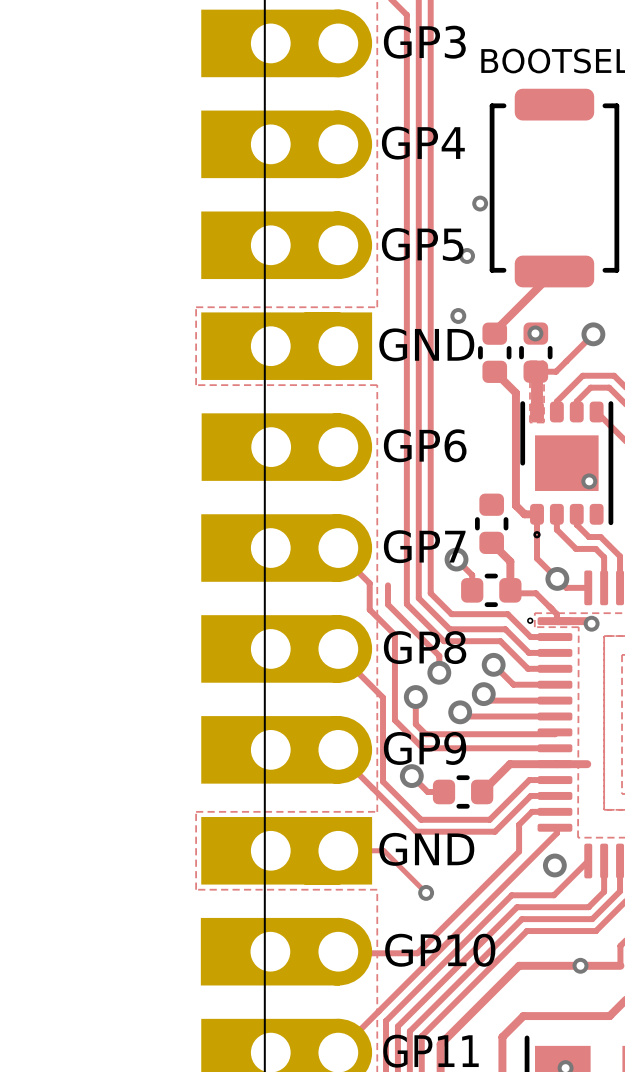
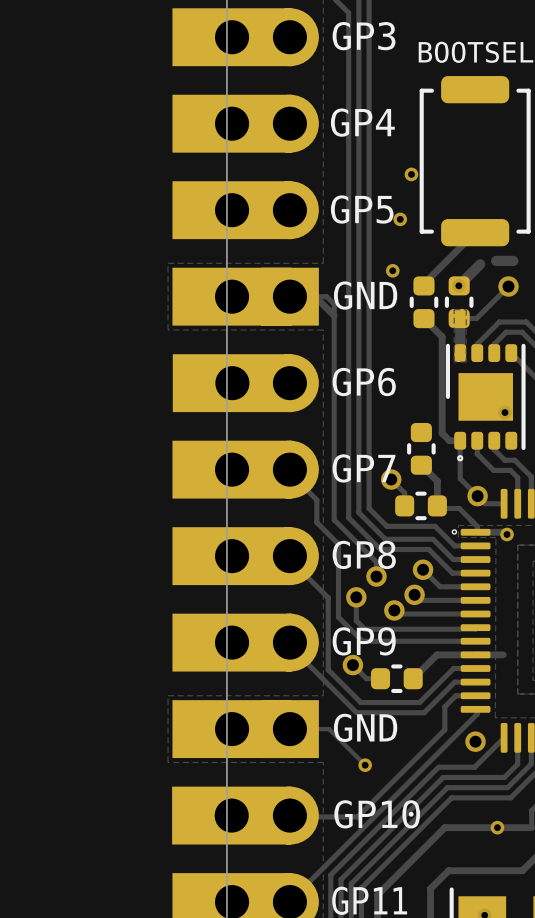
track: none -> (496, 260) (513, 260)
track: none -> (480, 264) (458, 285)
track: (387, 585) (387, 604) (389, 606) -> (334, 315) (315, 296) (289, 296) (326, 296) (334, 304) (334, 519)

